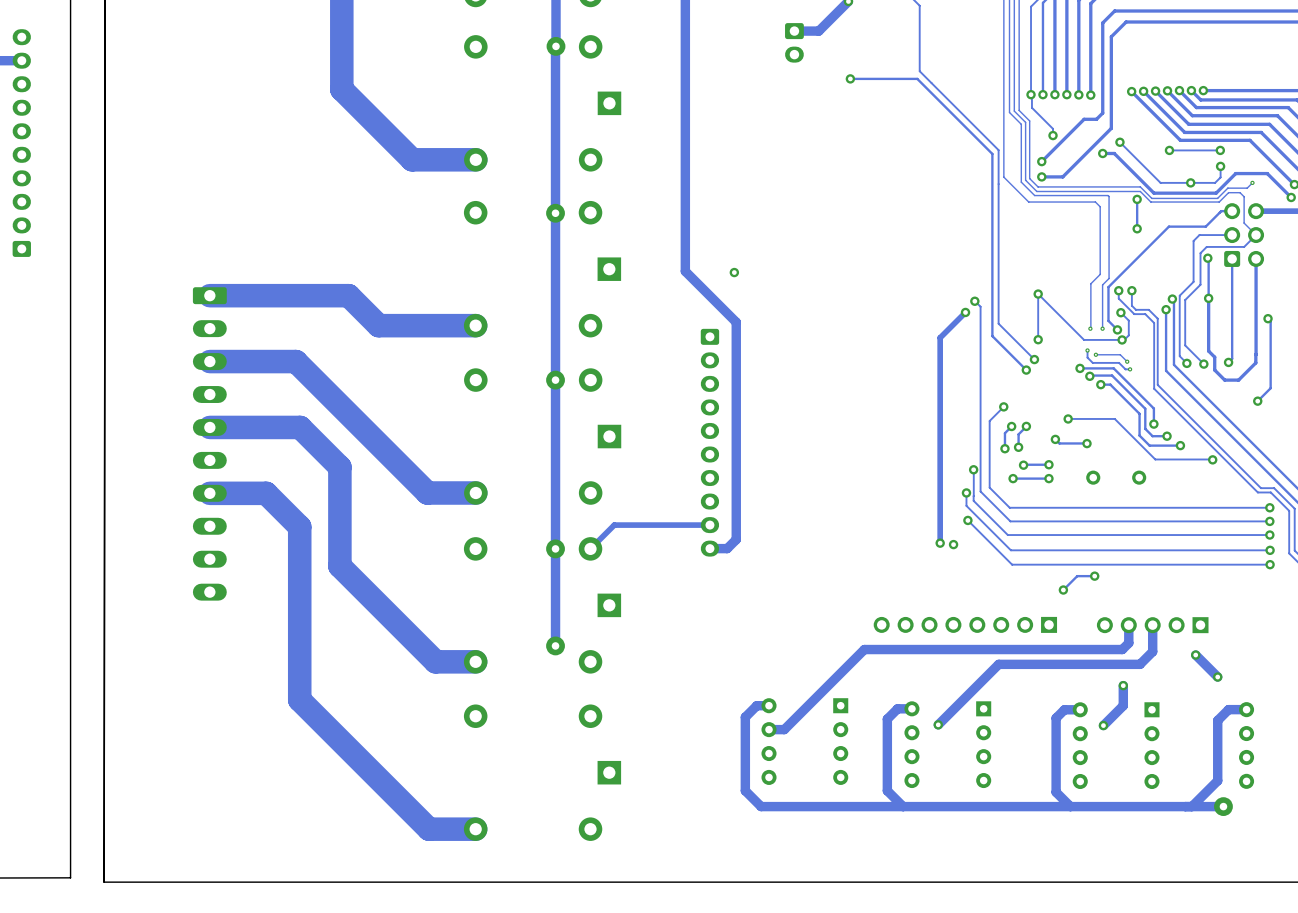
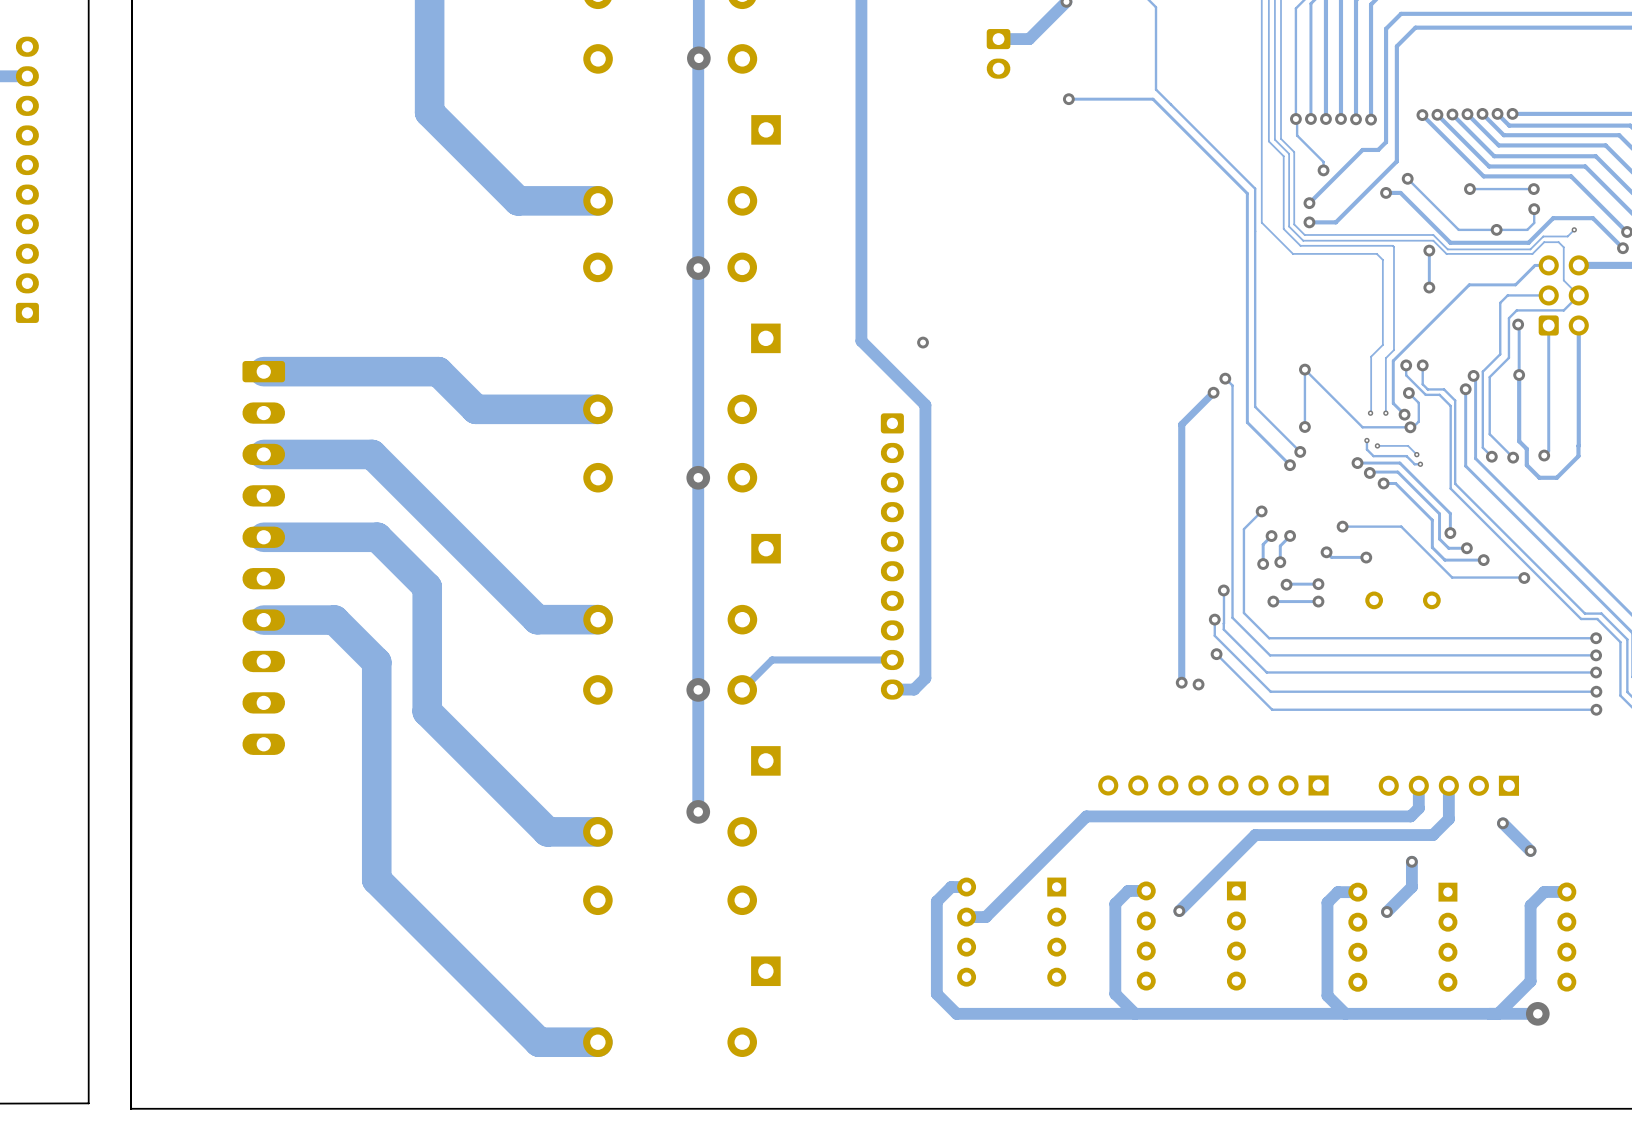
track: (1268, 318) (1270, 321) (1270, 388) (1257, 401) -> none
via: (1268, 318) -> none
via: (1257, 401) -> none
track: (1094, 576) (1077, 576) (1063, 590) -> none
via: (1094, 576) -> none
via: (1063, 590) -> none

